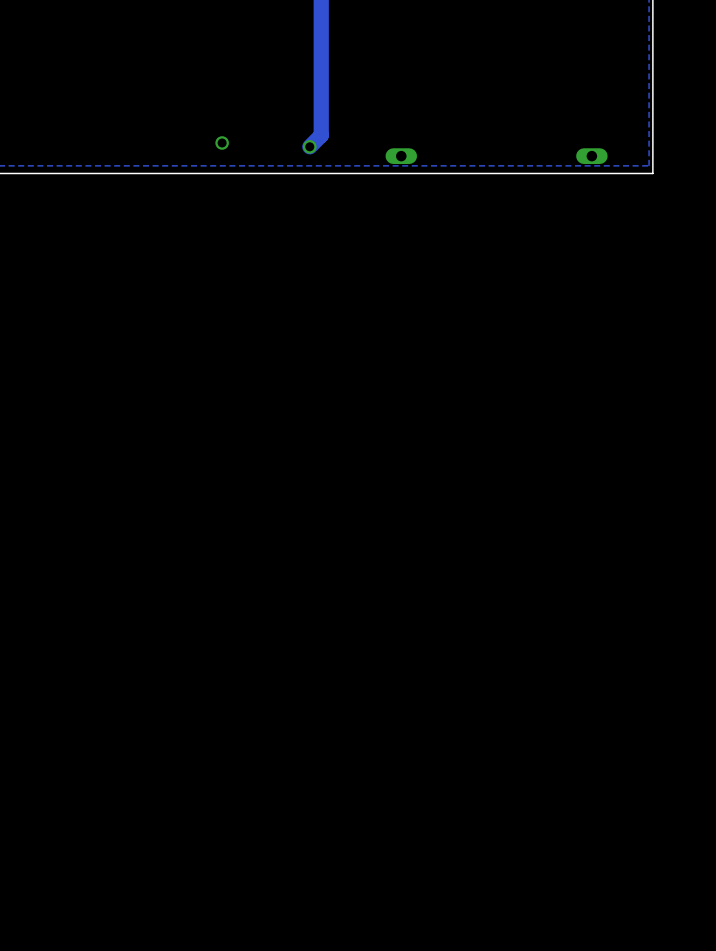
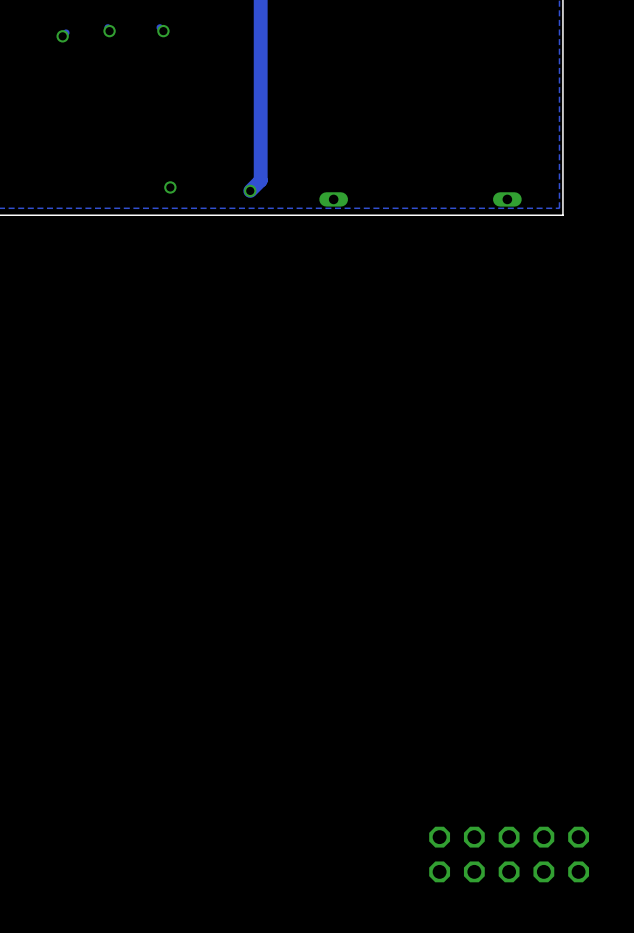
part: none -> (509, 854)

